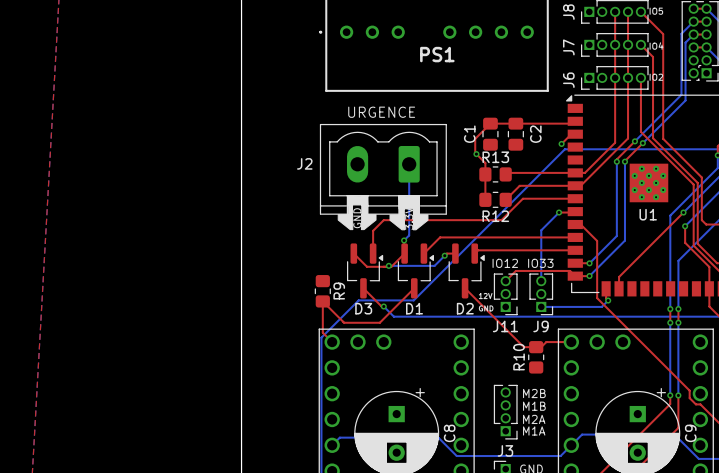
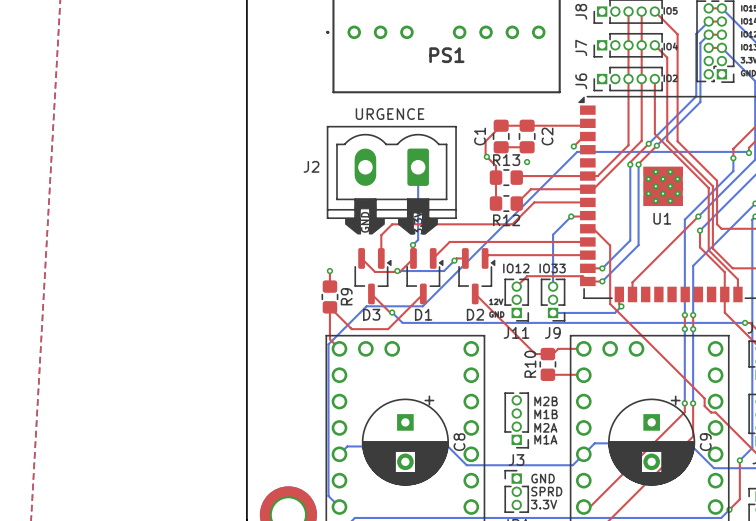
top track: none -> (501, 147) (527, 147)
via: none -> (527, 162)
top track: none -> (329, 271) (329, 286)
via: none -> (329, 271)
top track: none -> (547, 374) (583, 374)

